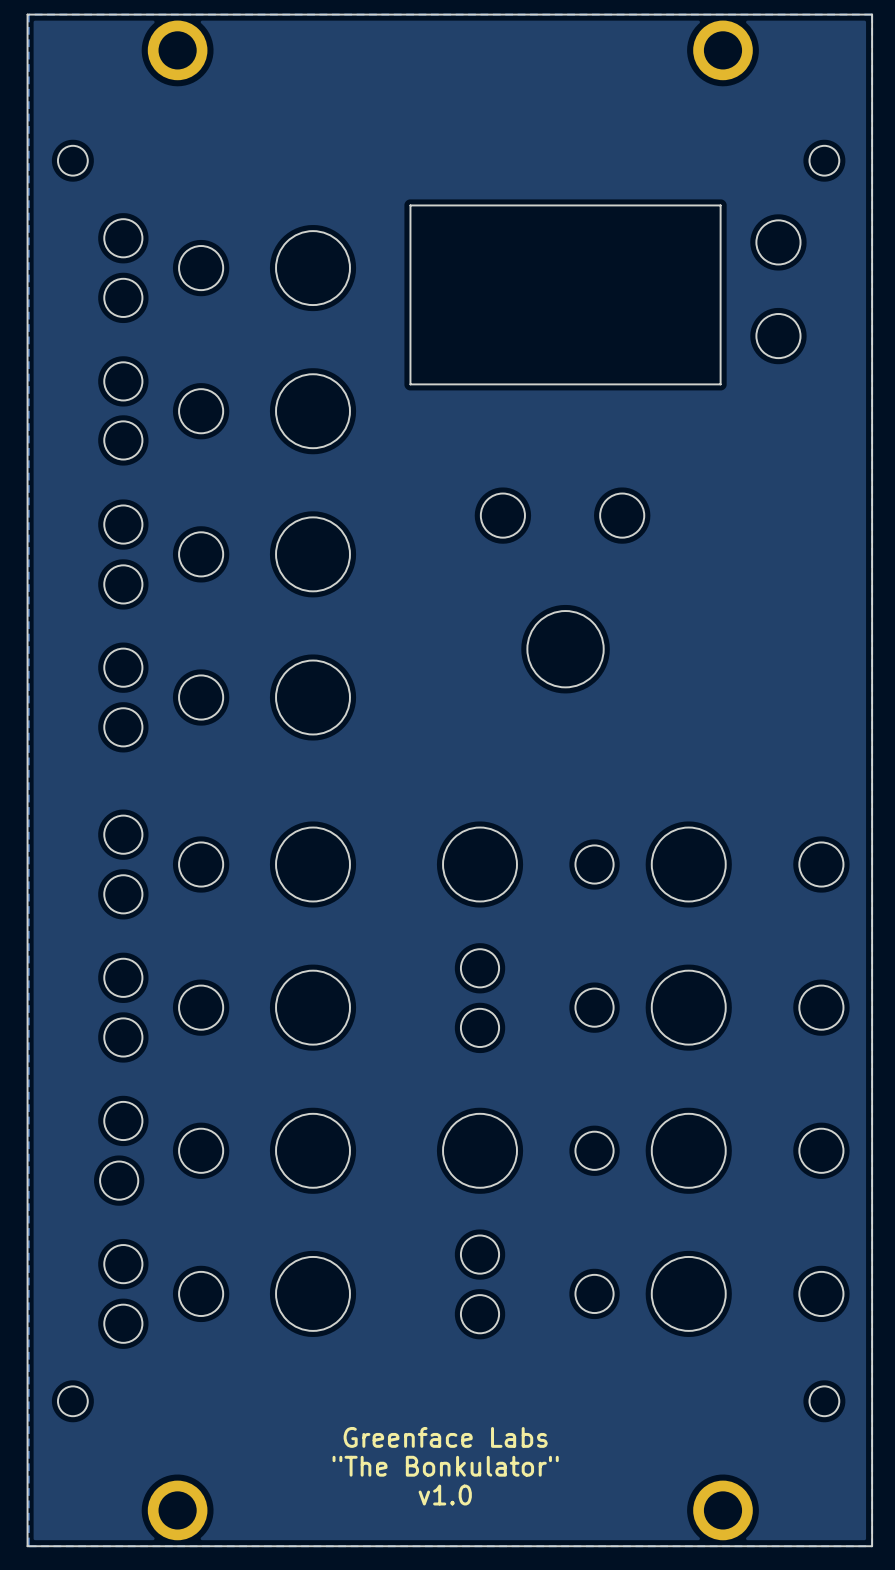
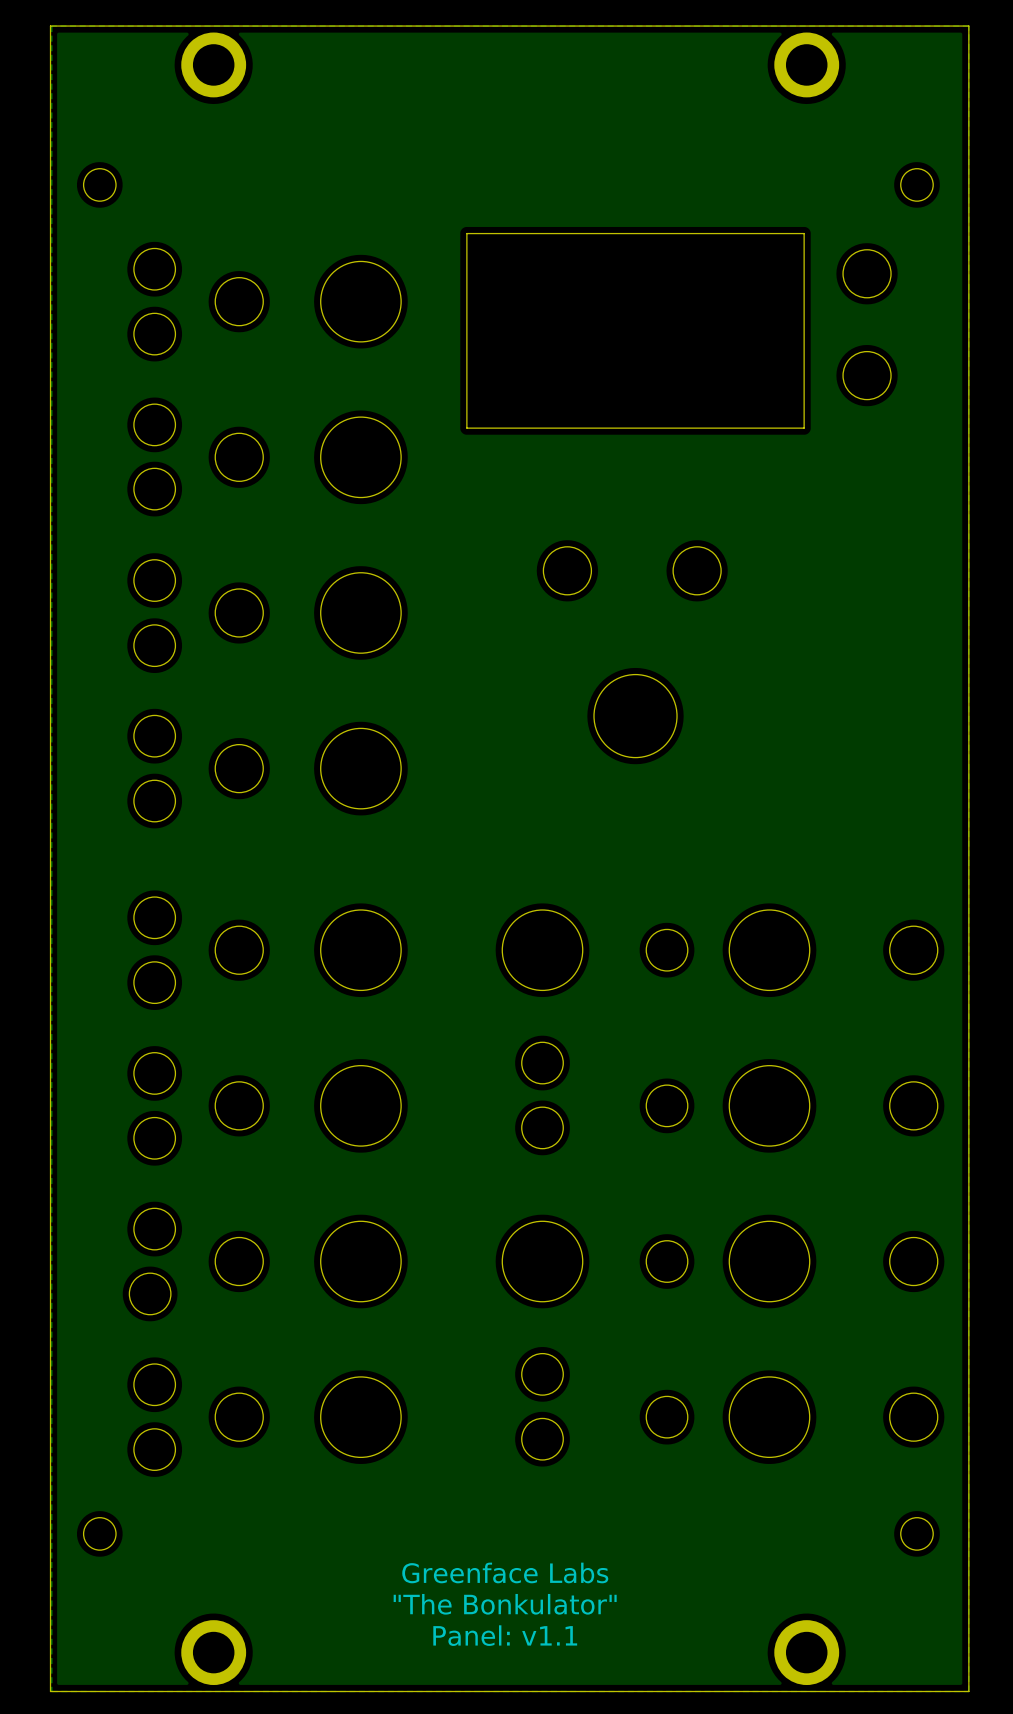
text: v1.0 (445, 1495) -> Panel: v1.1 (505, 1635)

